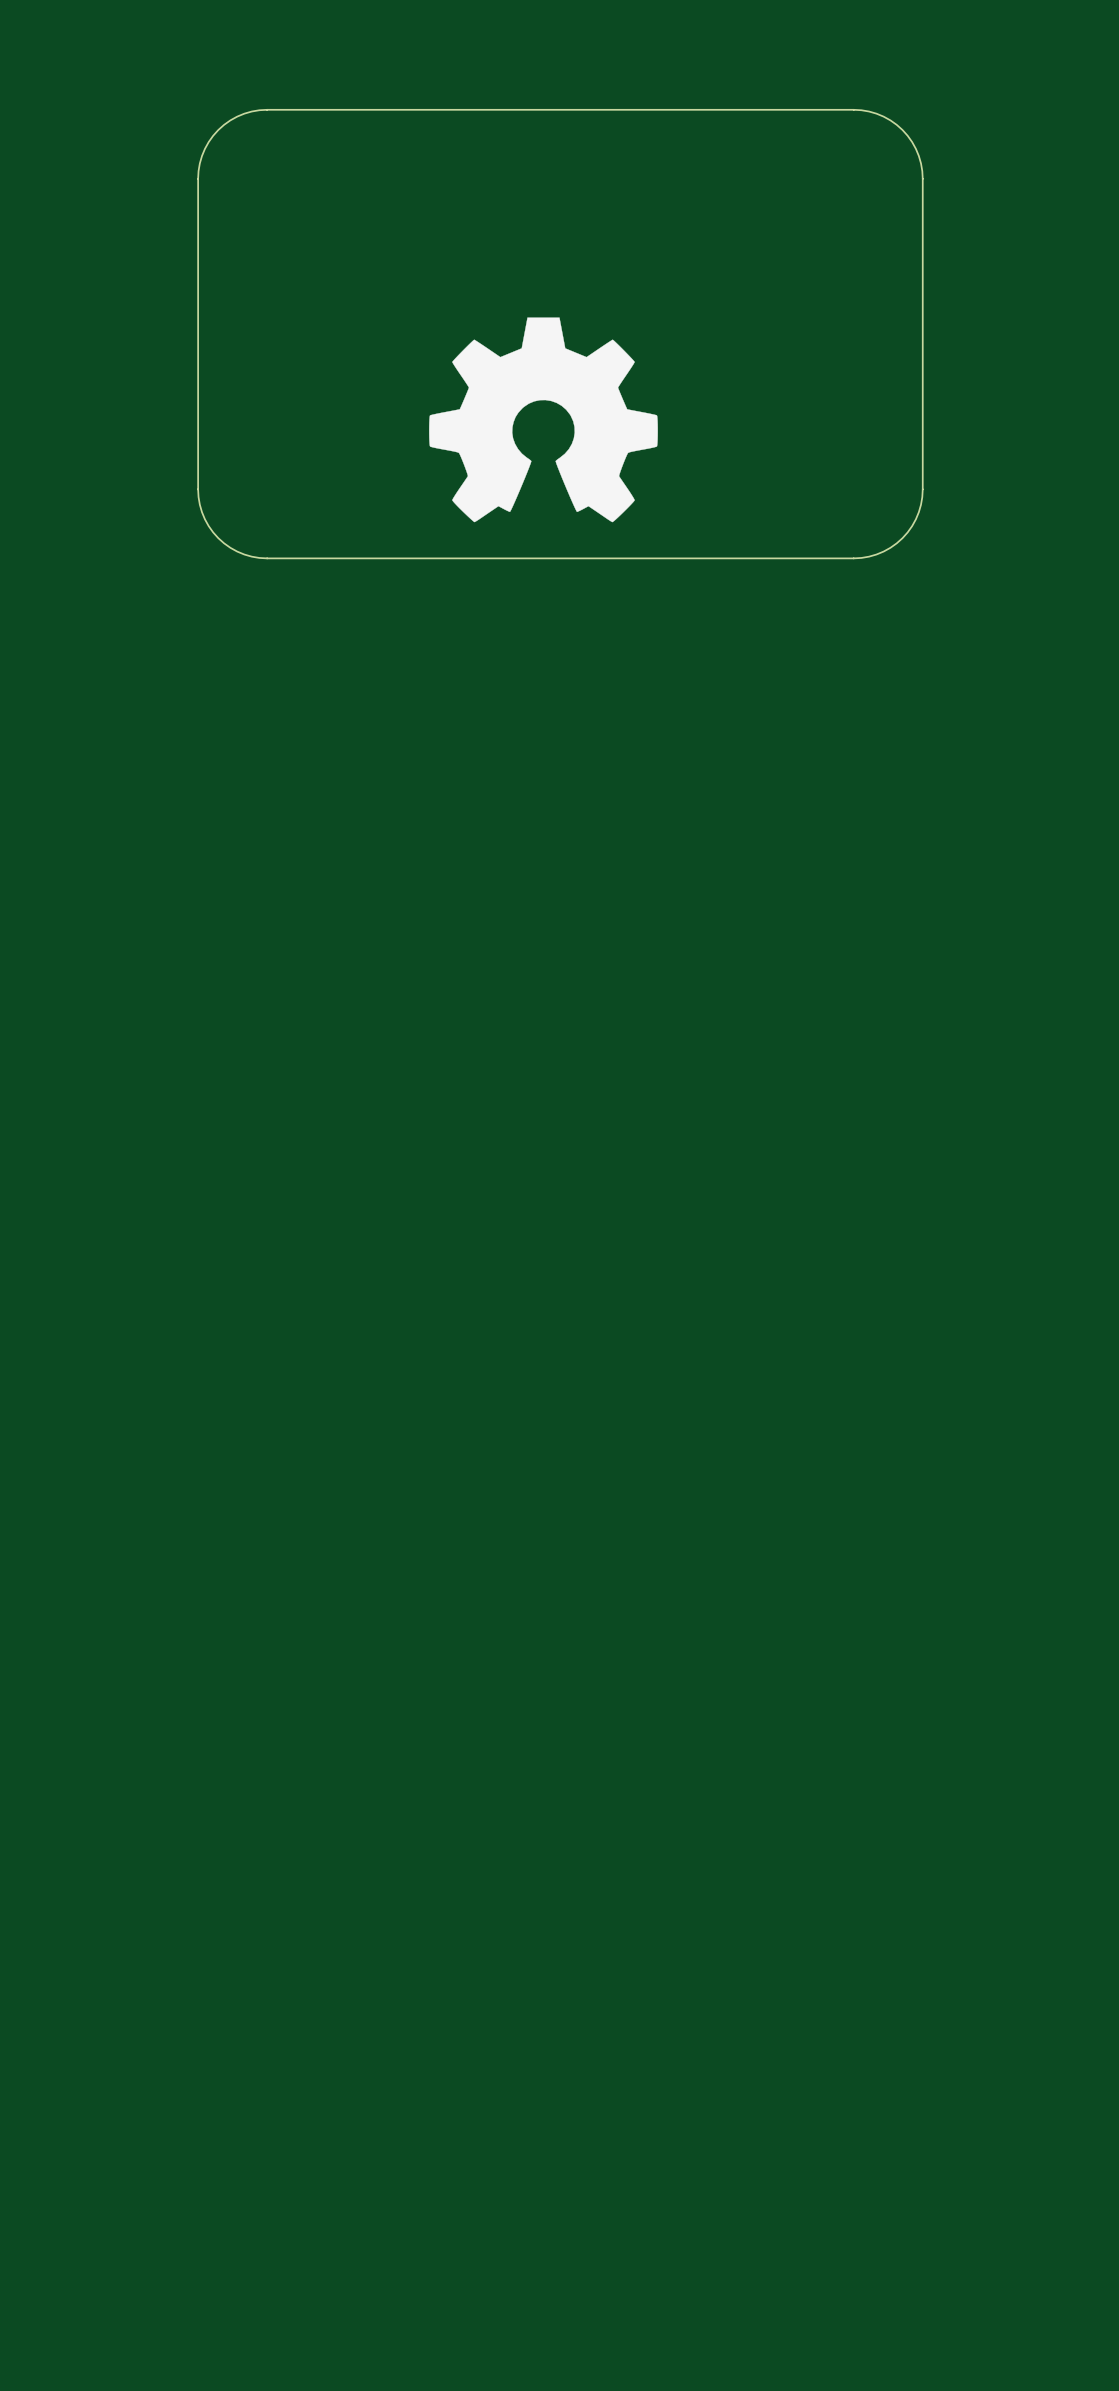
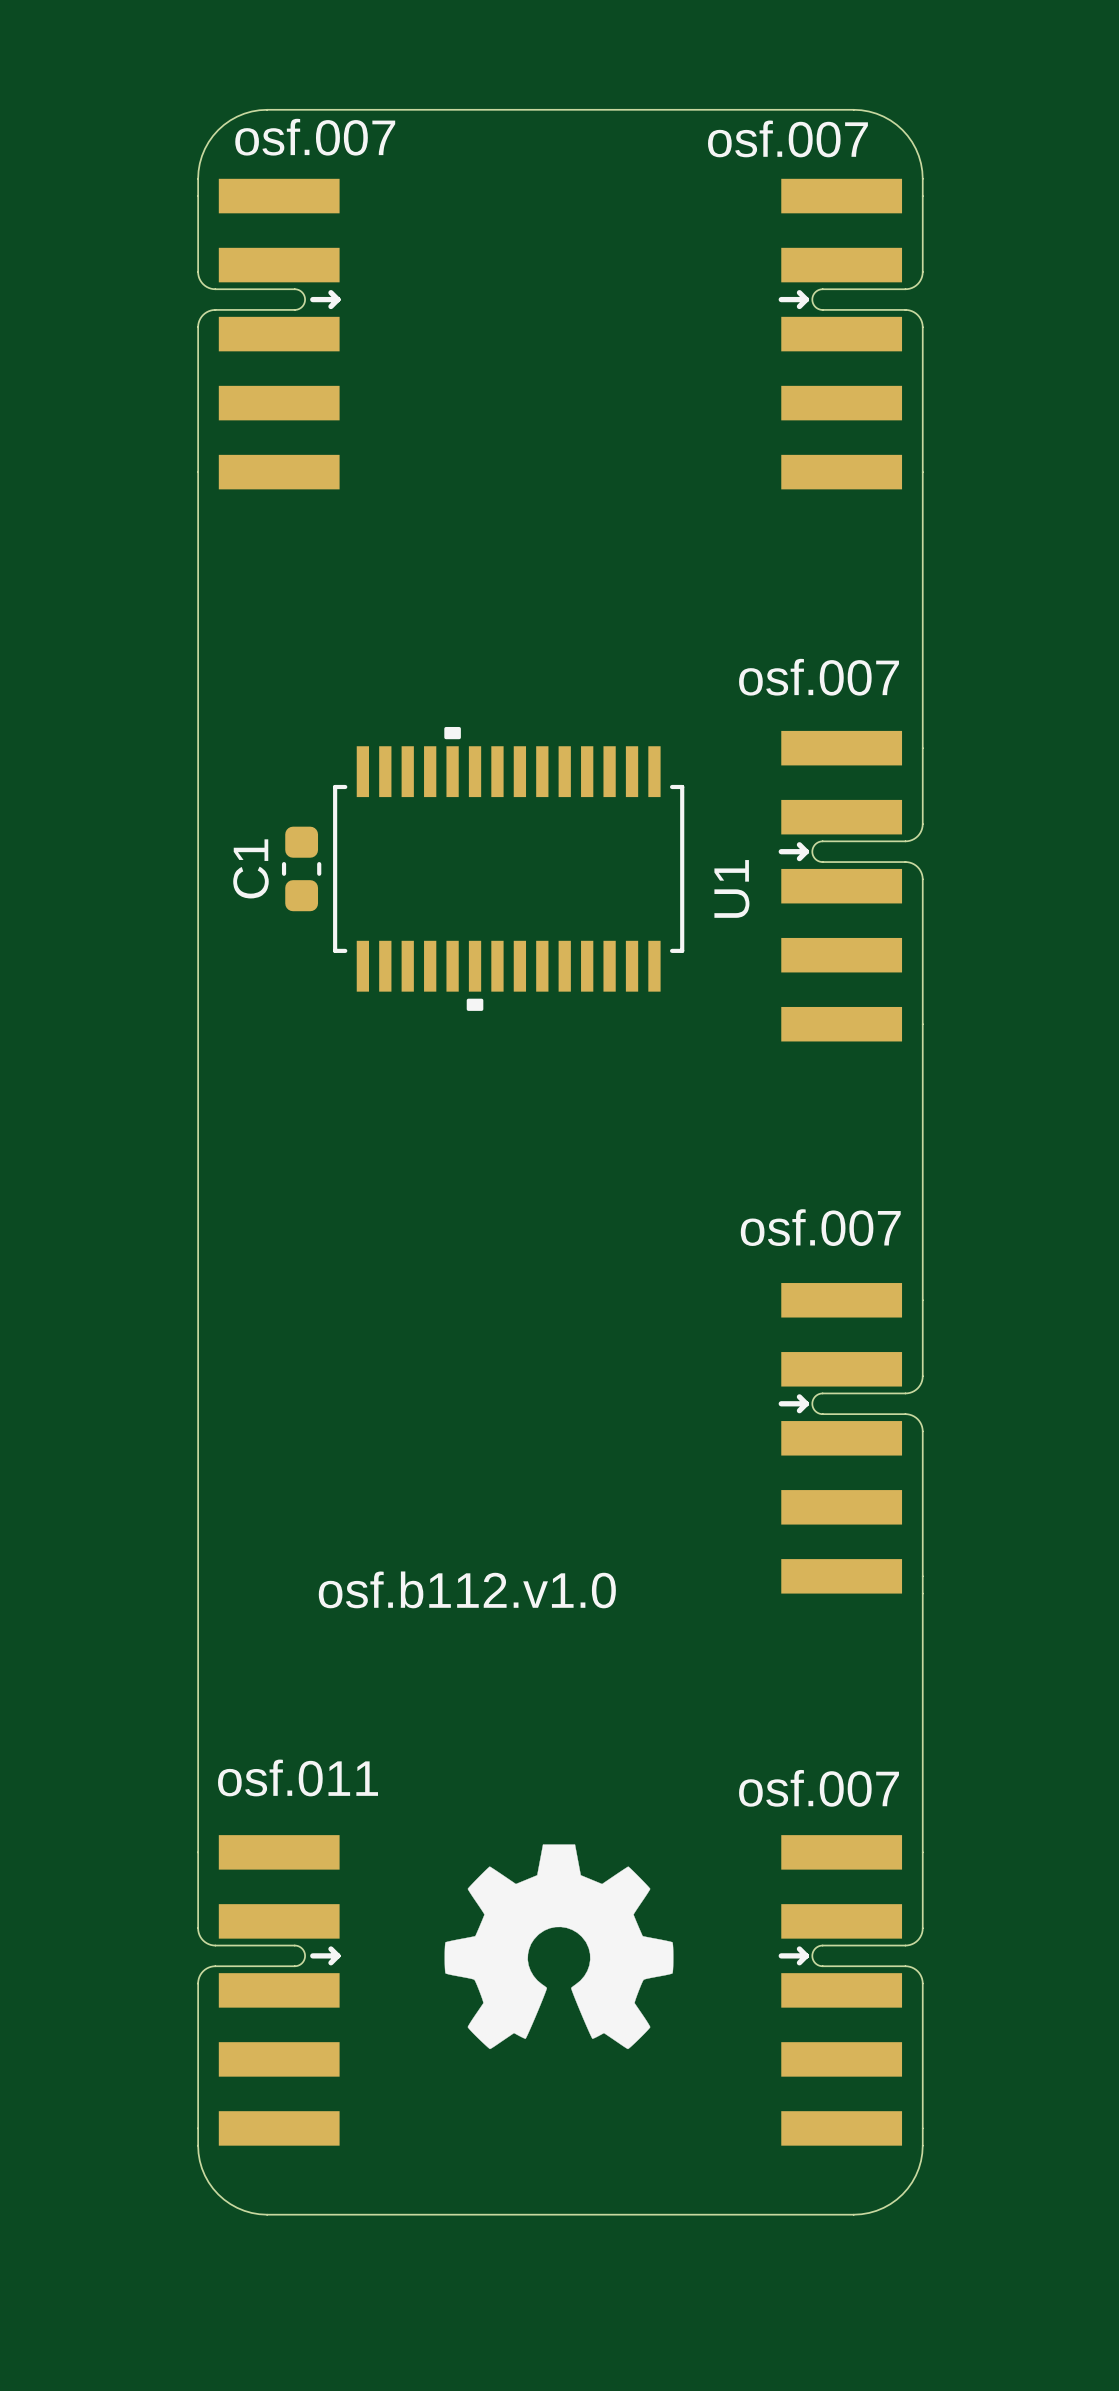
text: none -> osf.007 (315, 137)
text: none -> osf.007 (787, 138)
board edge: (198, 196) (198, 472) -> none
board edge: (922, 196) (922, 472) -> (922, 1024) (922, 1300)
drawing: [429, 317, 658, 523] -> none
part: none -> (268, 334)
part: none -> (851, 334)
board edge: (198, 489) (199, 504) (204, 519) (218, 538) (230, 547) (244, 554) (267, 558) (861, 557) (883, 551) (896, 543) (907, 532) (918, 512) (922, 489) -> (922, 748) (922, 489)
board edge: none -> (198, 489) (198, 1852)
text: none -> osf.007 (819, 677)
C1: none -> (301, 868)
U1: none -> (508, 868)
part: none -> (851, 886)
text: none -> osf.007 (820, 1227)
part: none -> (851, 1438)
board edge: none -> (922, 1576) (922, 1852)
text: none -> osf.b112.v1.0 (467, 1589)
text: none -> osf.011 (298, 1777)
text: none -> osf.007 (819, 1788)
drawing: none -> [444, 1844, 674, 2050]
part: none -> (268, 1990)
part: none -> (851, 1990)
board edge: none -> (198, 2128) (199, 2161) (204, 2175) (213, 2188) (224, 2199) (237, 2207) (251, 2212) (267, 2214) (861, 2214) (883, 2207) (896, 2199) (907, 2188) (915, 2175) (921, 2161) (922, 2128)

